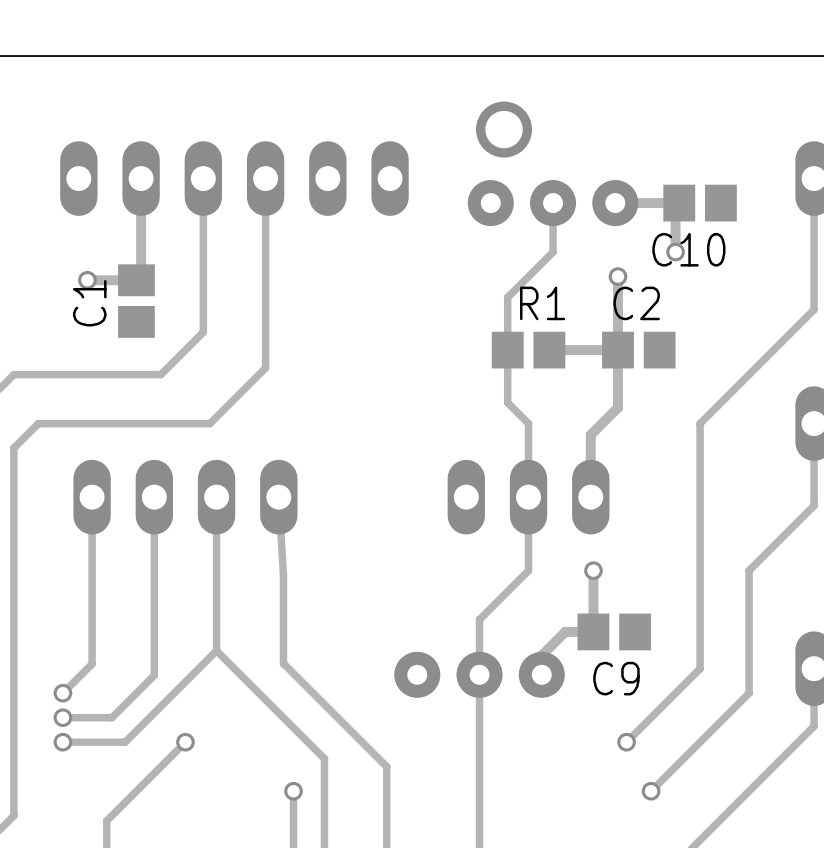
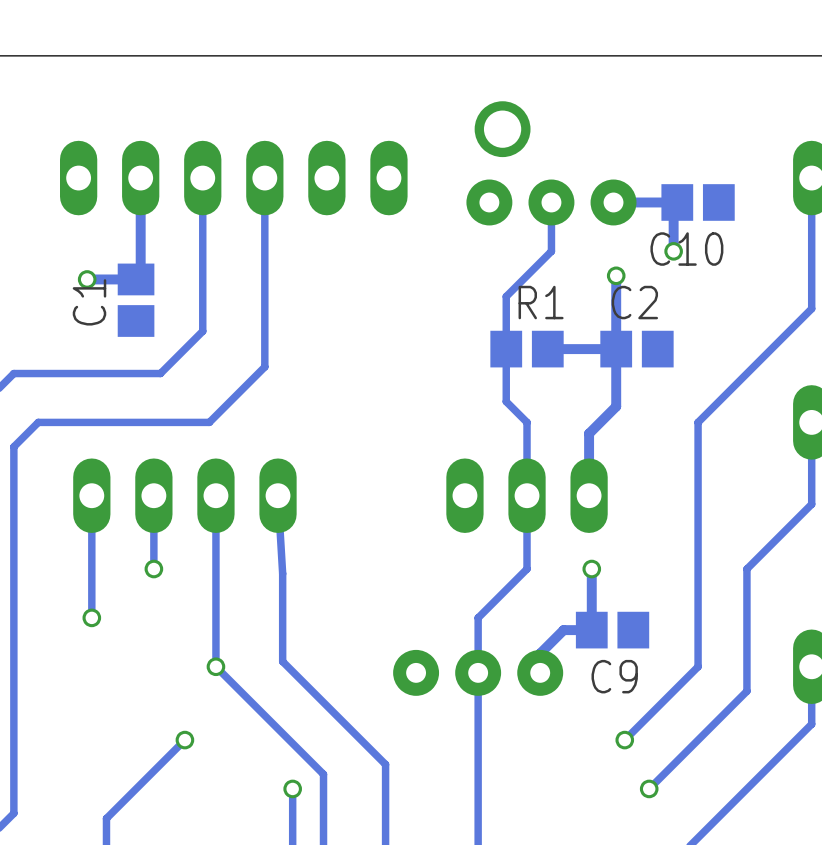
track: (154, 570) (154, 675) (111, 717) (62, 717) -> none
via: none -> (153, 569)
track: (92, 619) (92, 664) (62, 693) -> none
via: none -> (91, 617)
via: none -> (215, 666)
via: (62, 693) -> none
via: (62, 717) -> none
track: (62, 742) (125, 742) (216, 650) (324, 758) (324, 776) -> (215, 648) (215, 666) (323, 774)
via: (62, 742) -> none

